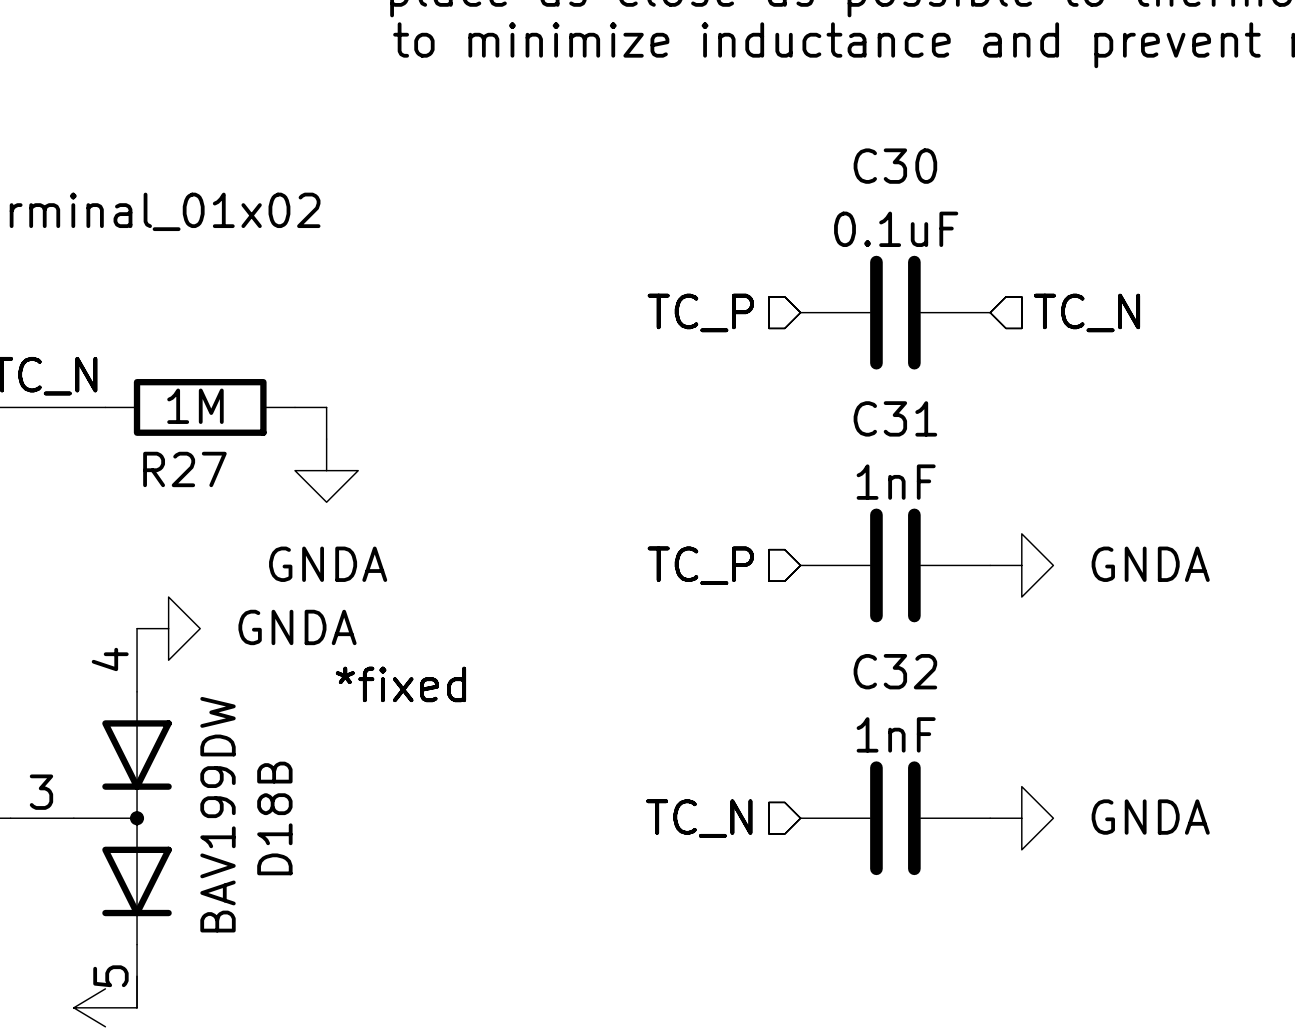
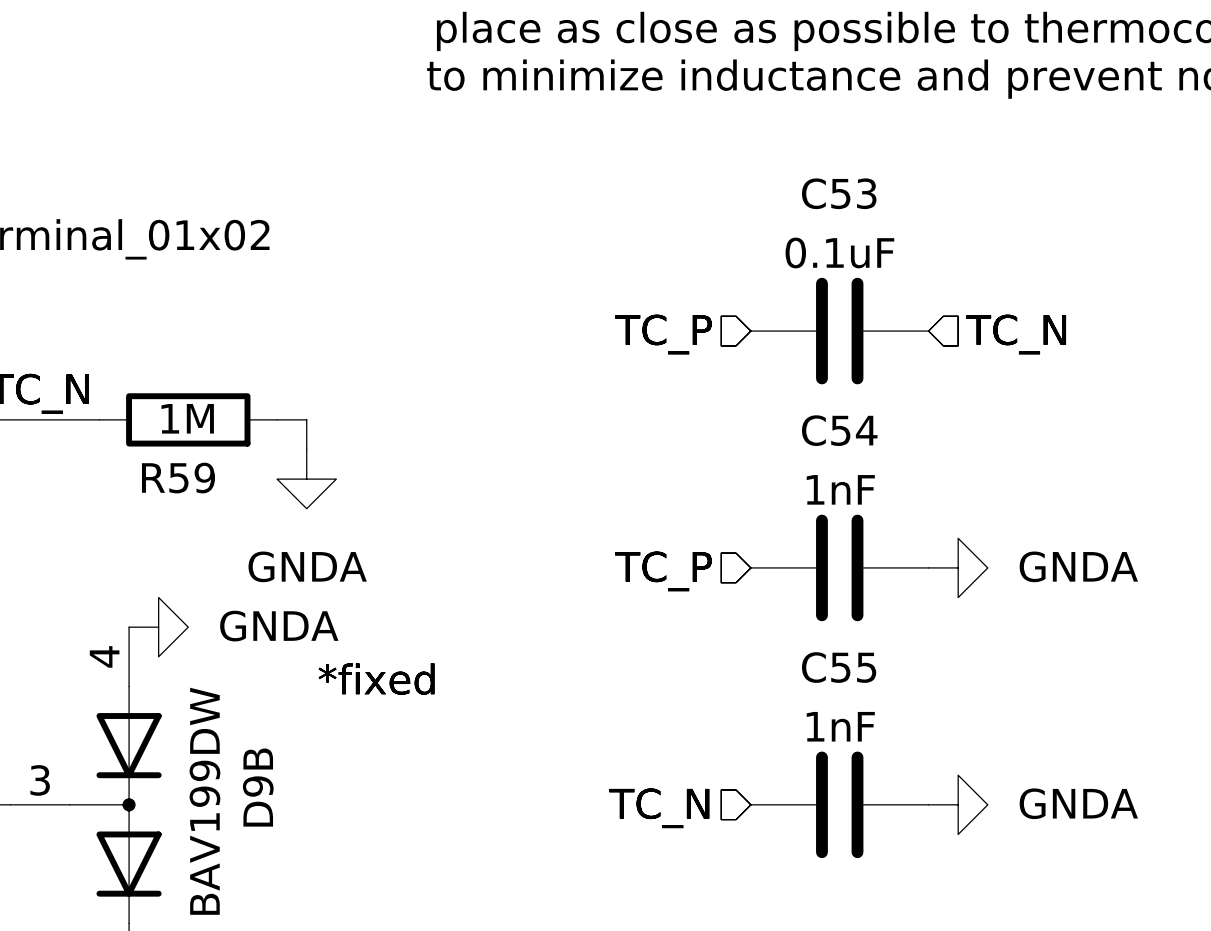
C30 name: C30 (895, 166) -> C53 (839, 193)
C31 name: C31 (895, 418) -> C54 (839, 430)
R27 name: R27 (184, 469) -> R59 (178, 478)
C32 name: C32 (895, 671) -> C55 (839, 667)
D18B name: D18B (274, 818) -> D9B (258, 787)

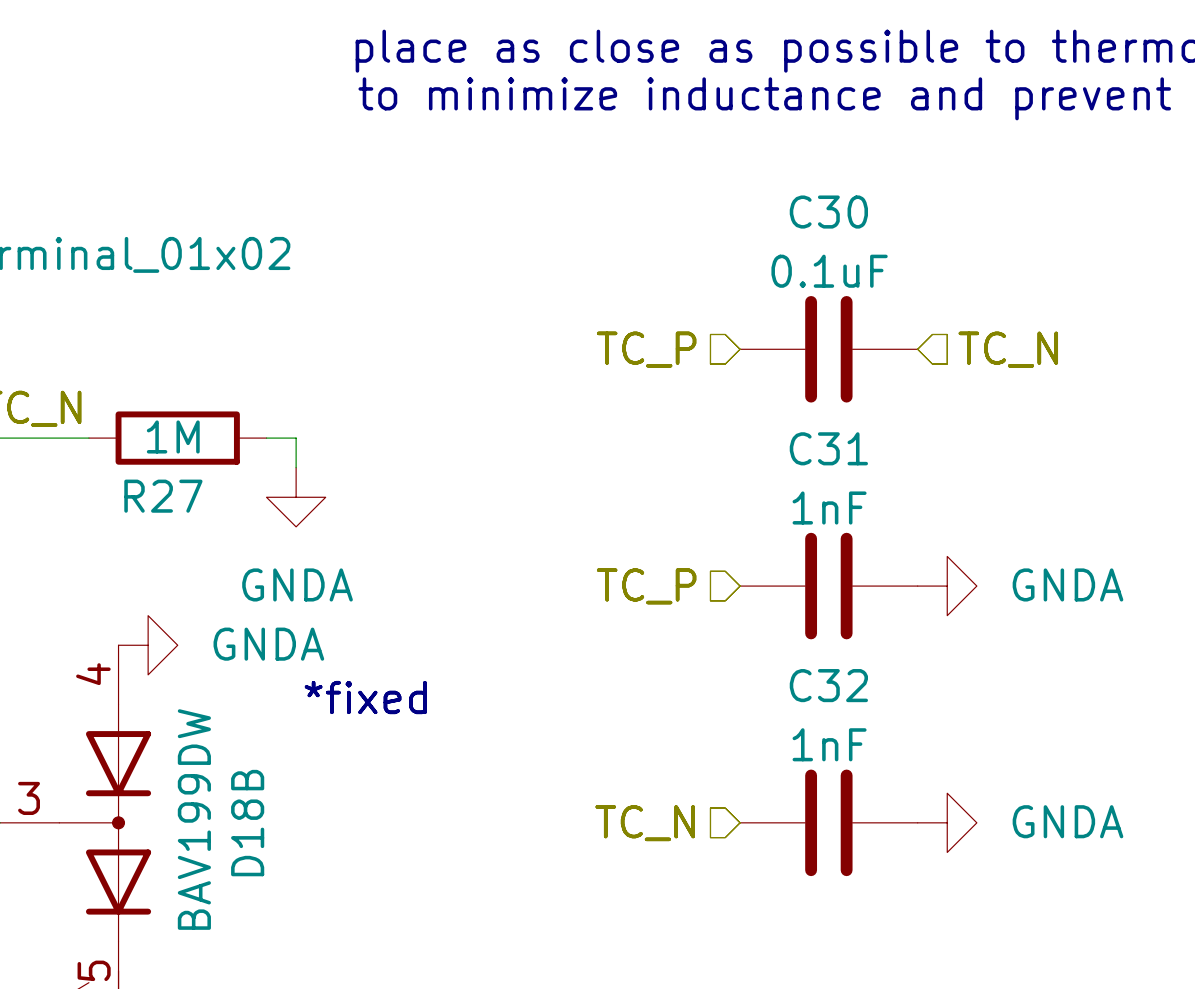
C53 name: C53 (839, 193) -> C30 (828, 212)
C54 name: C54 (839, 430) -> C31 (828, 448)
R59 name: R59 (178, 478) -> R27 (163, 496)
C55 name: C55 (839, 667) -> C32 (828, 685)
D9B name: D9B (258, 787) -> D18B (247, 823)

